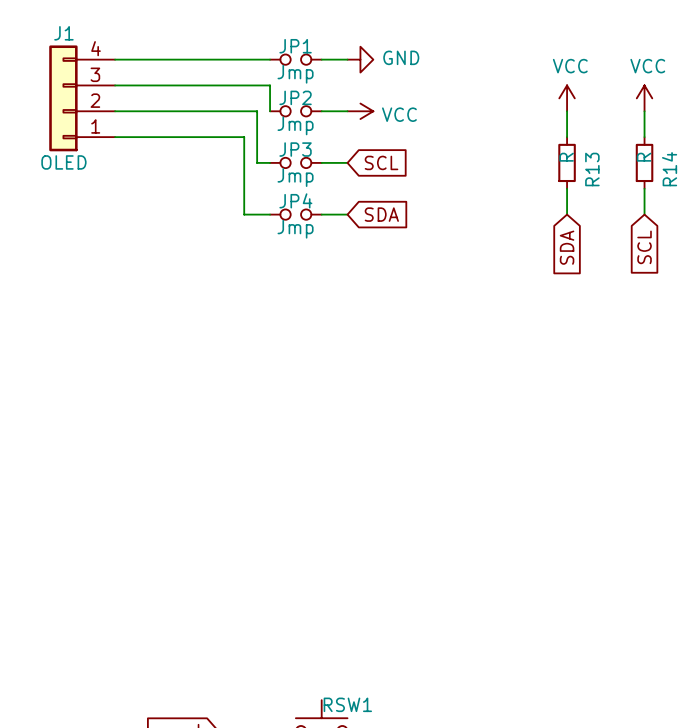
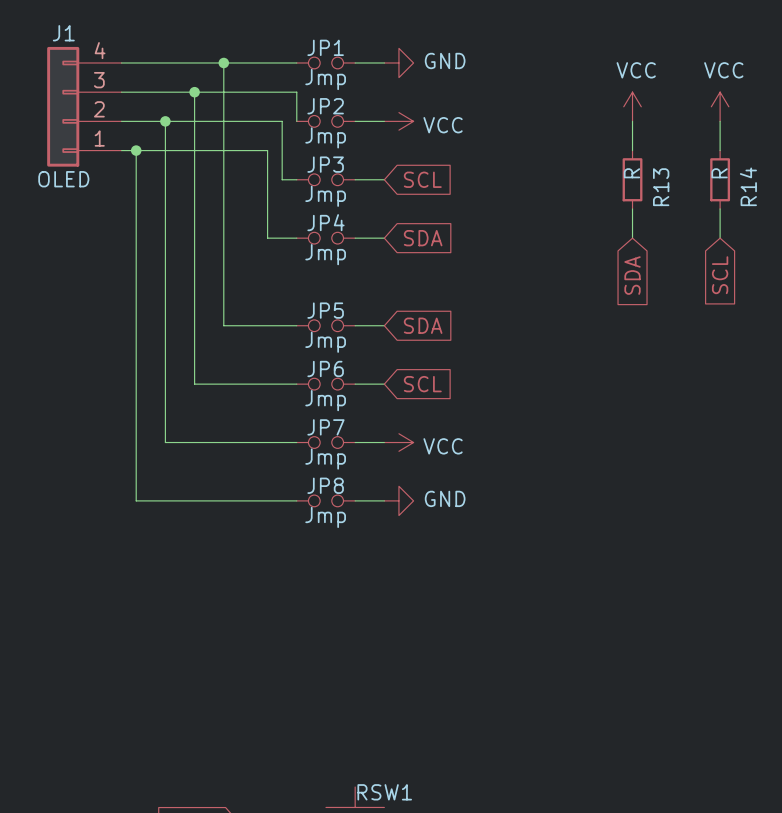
wire: none -> (223, 62) (223, 325) (296, 325)
junction: none -> (223, 62)
wire: none -> (194, 92) (194, 384) (296, 384)
junction: none -> (194, 92)
wire: none -> (165, 121) (165, 442) (296, 442)
junction: none -> (165, 121)
wire: none -> (136, 150) (136, 500) (296, 500)
junction: none -> (136, 150)
JP5: none -> Jmp (325, 325)
wire: none -> (355, 325) (384, 325)
global label: none -> SDA (423, 325)
JP6: none -> Jmp (325, 384)
wire: none -> (355, 384) (384, 384)
global label: none -> SCL (422, 384)
JP7: none -> Jmp (325, 442)
wire: none -> (355, 442) (384, 442)
power symbol: none -> VCC (398, 442)
JP8: none -> Jmp (325, 500)
wire: none -> (355, 500) (384, 500)
power symbol: none -> GND (398, 500)

